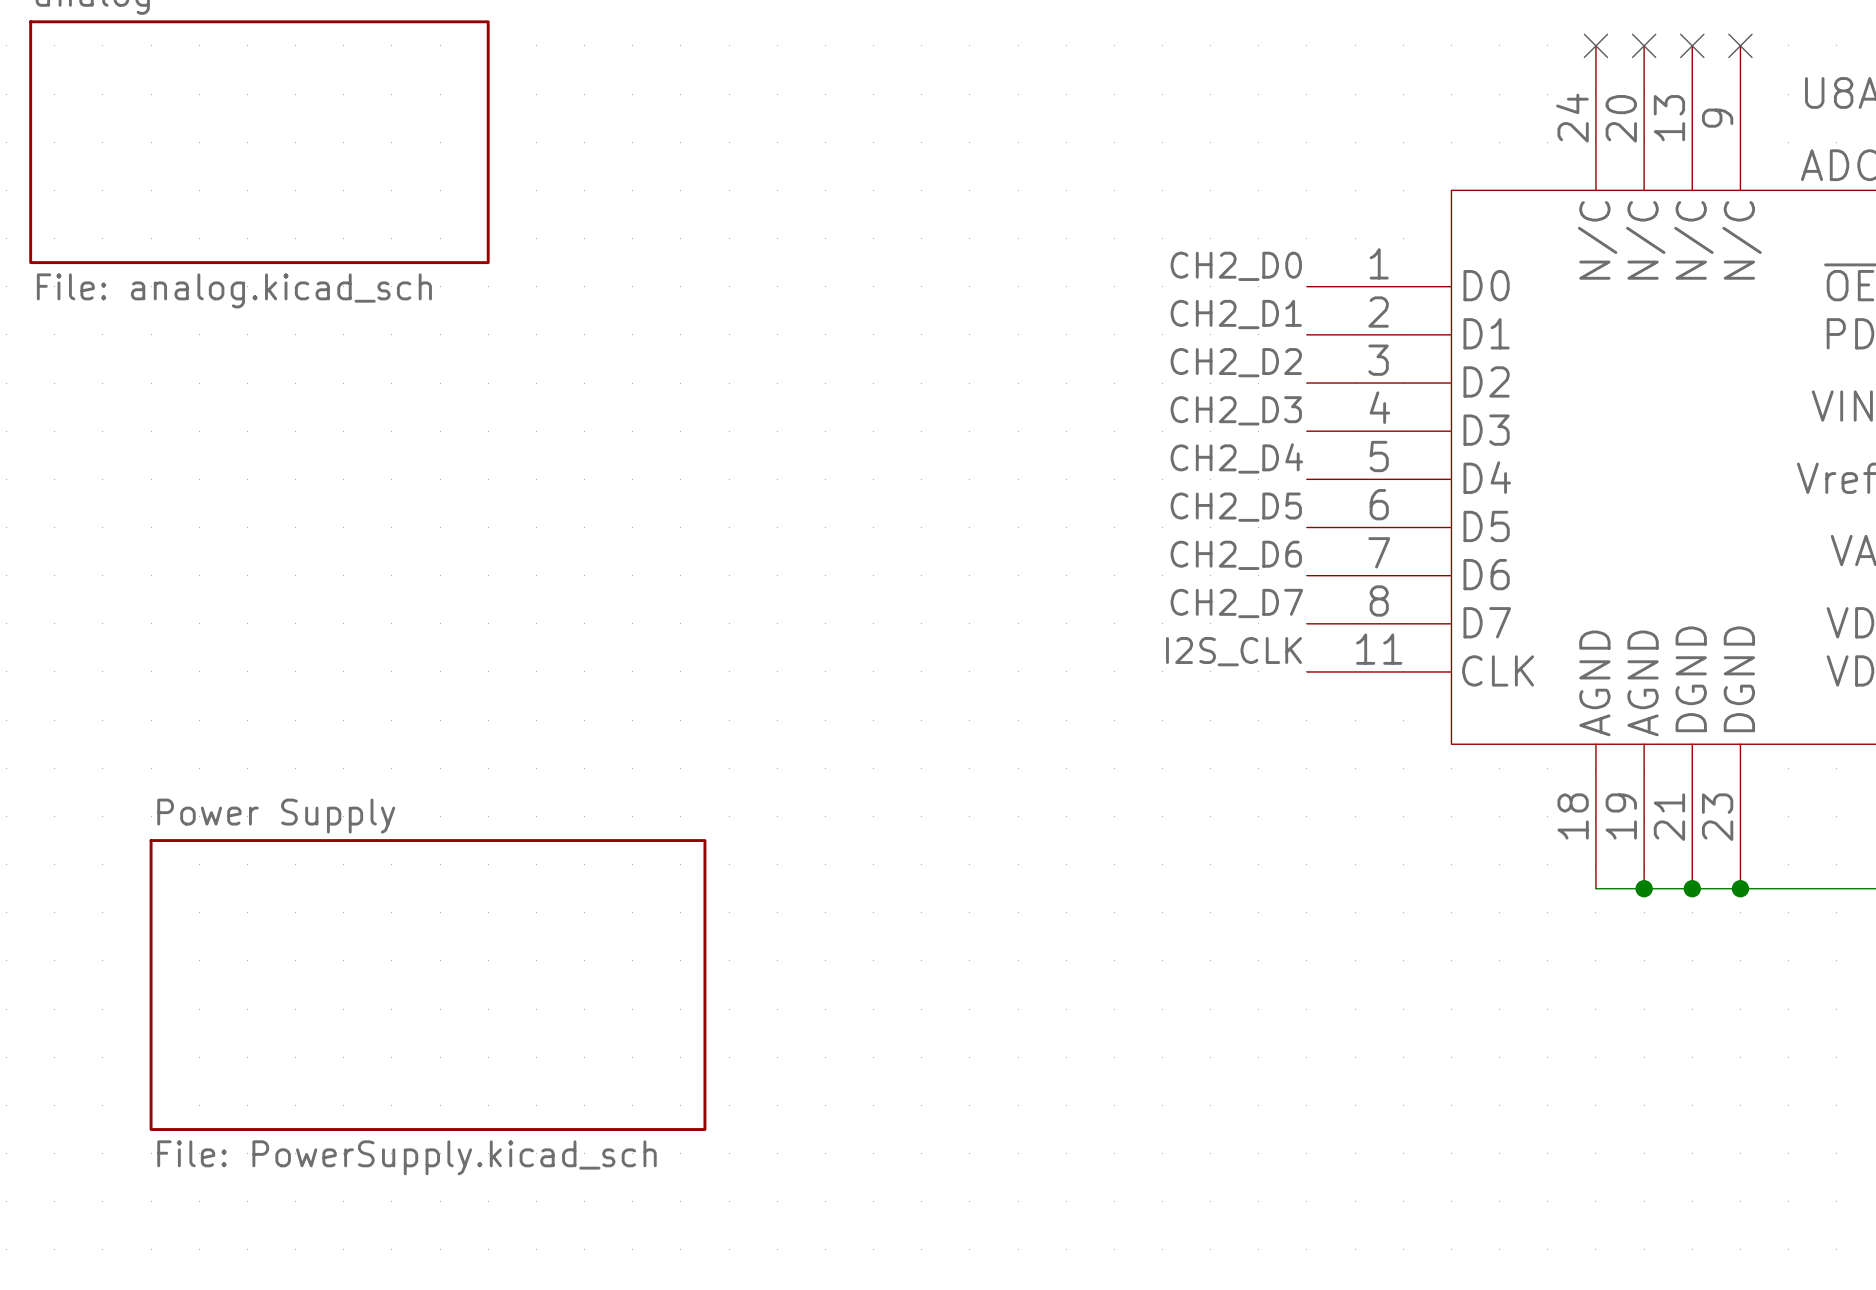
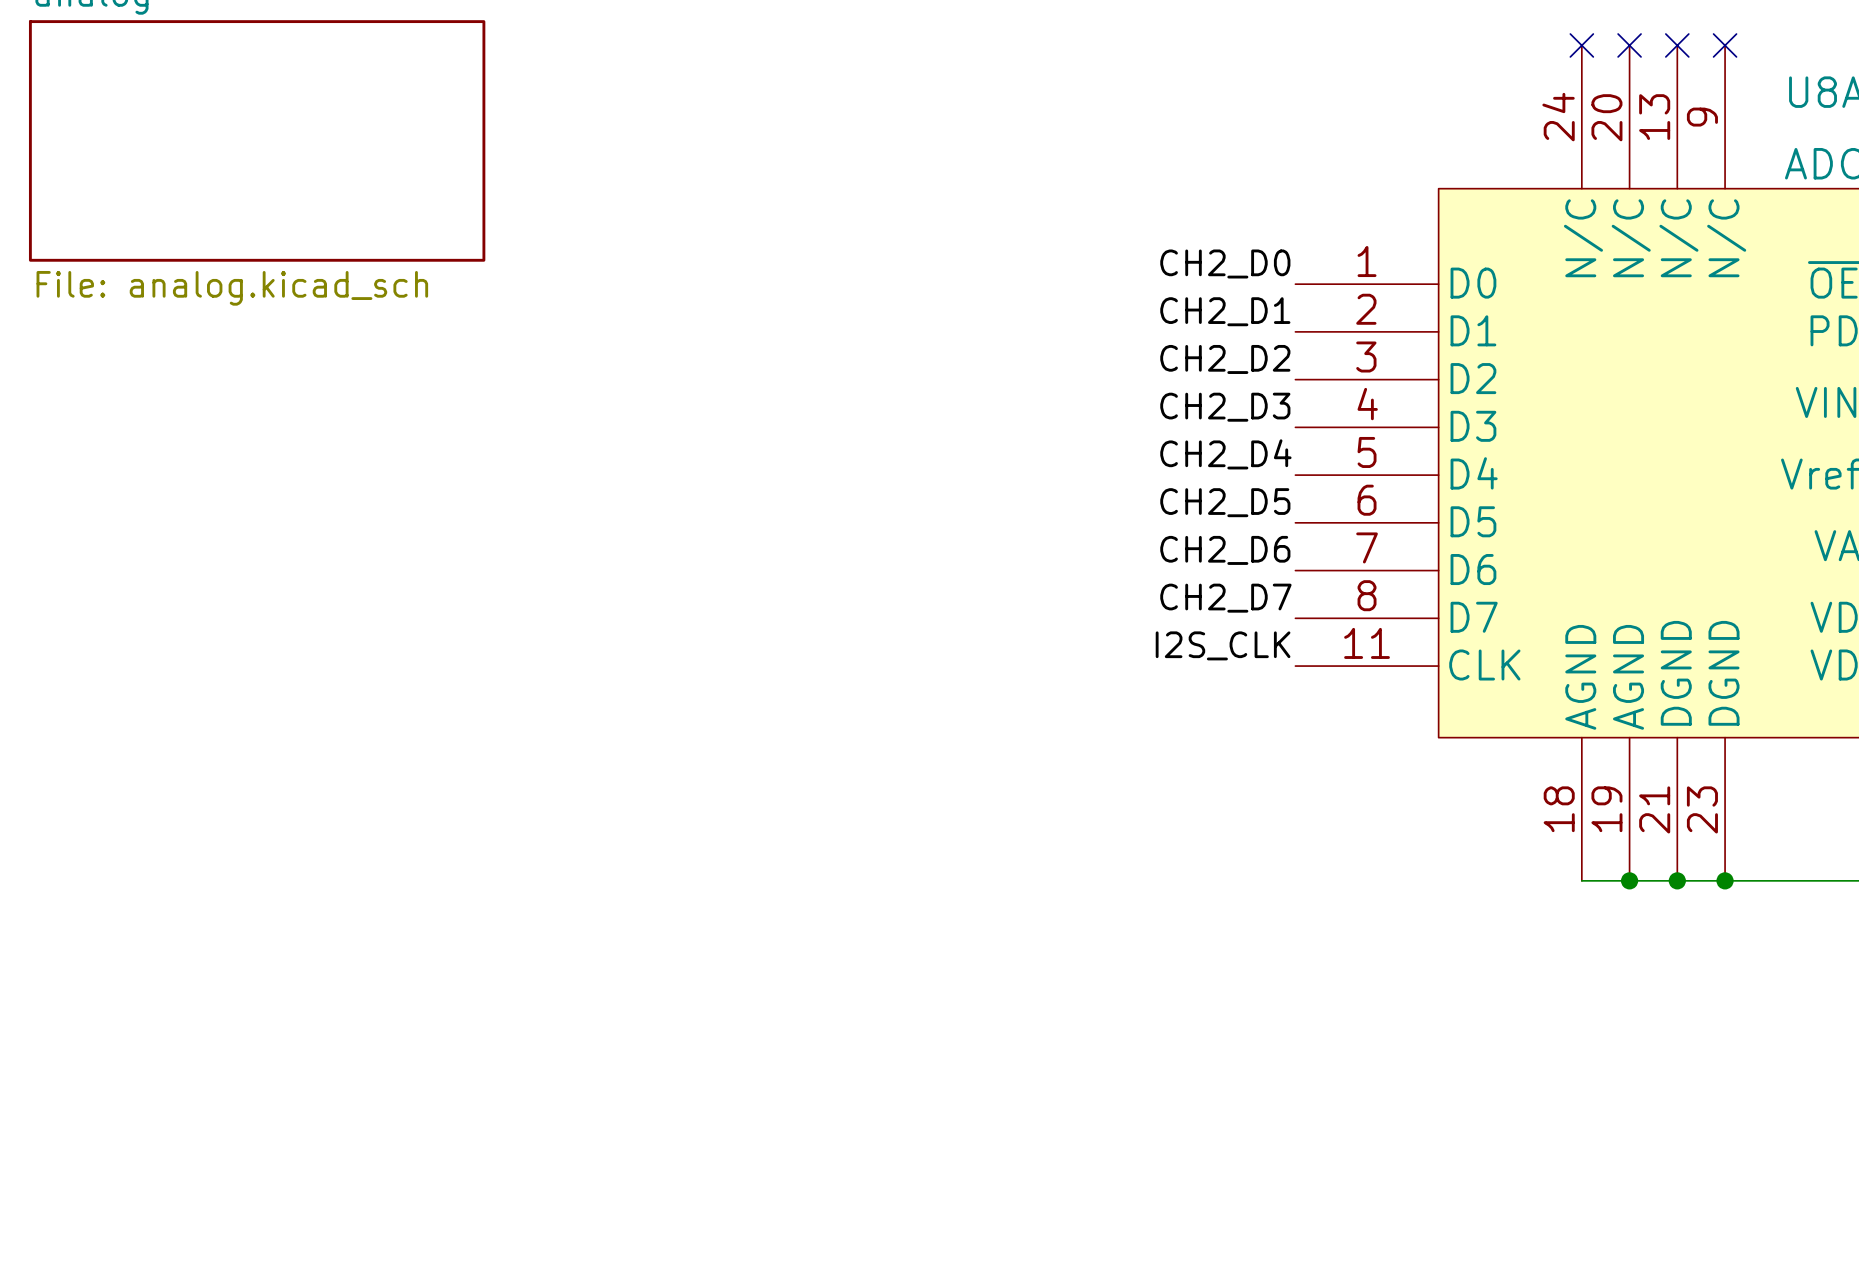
sheet Power Supply: File: PowerSupply.kicad_sch (428, 985) -> none

